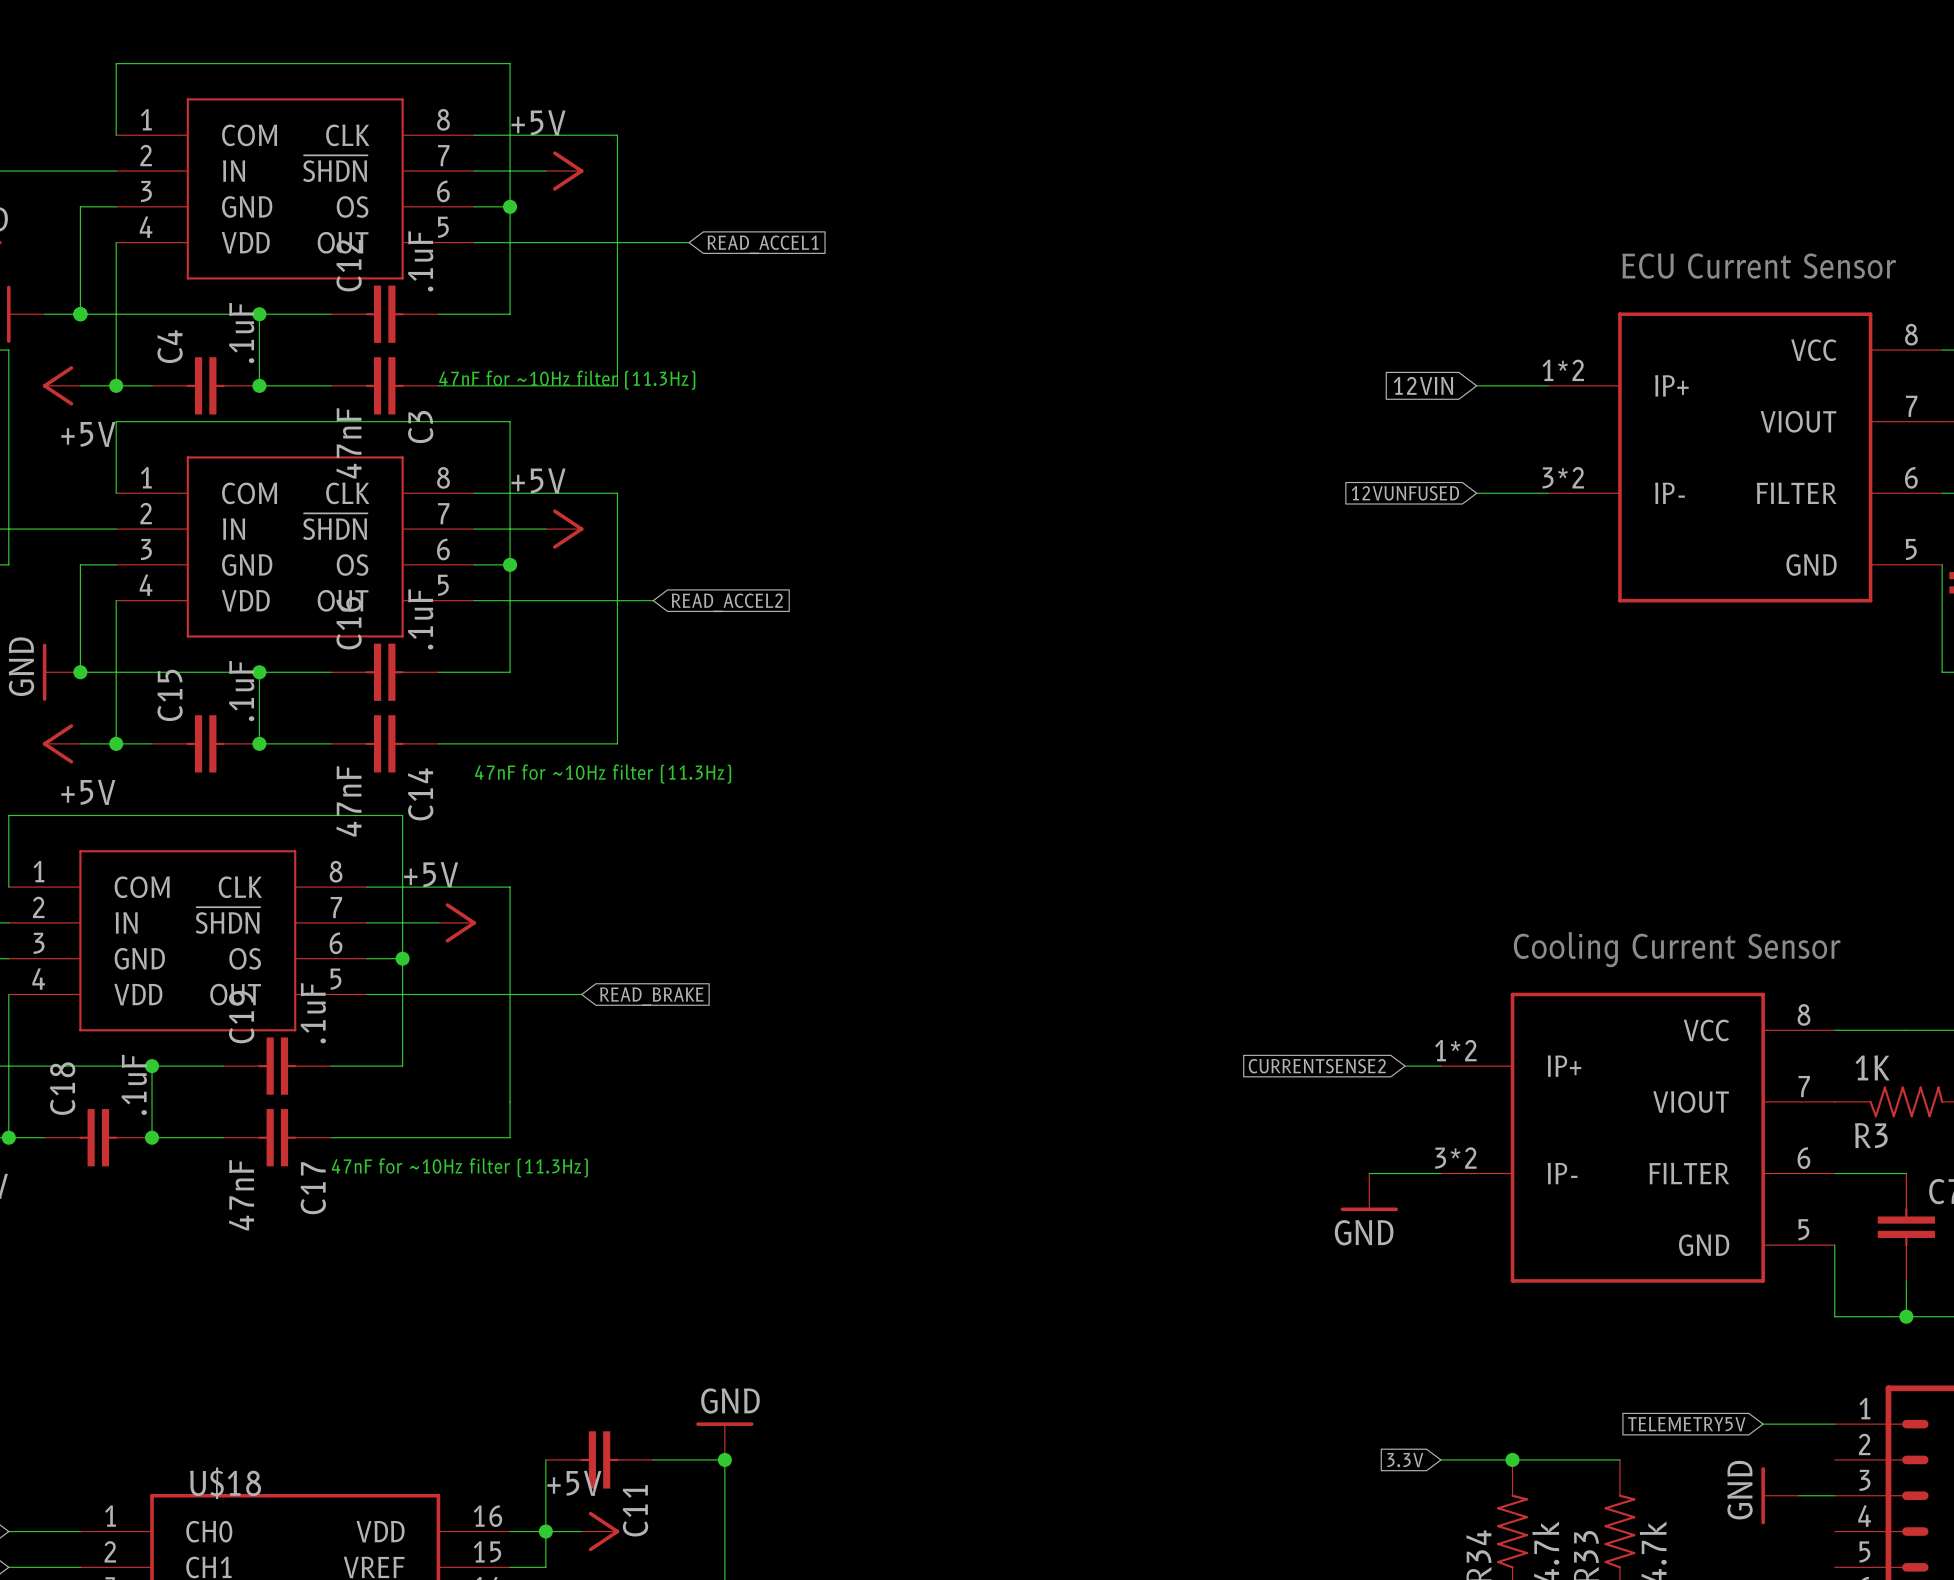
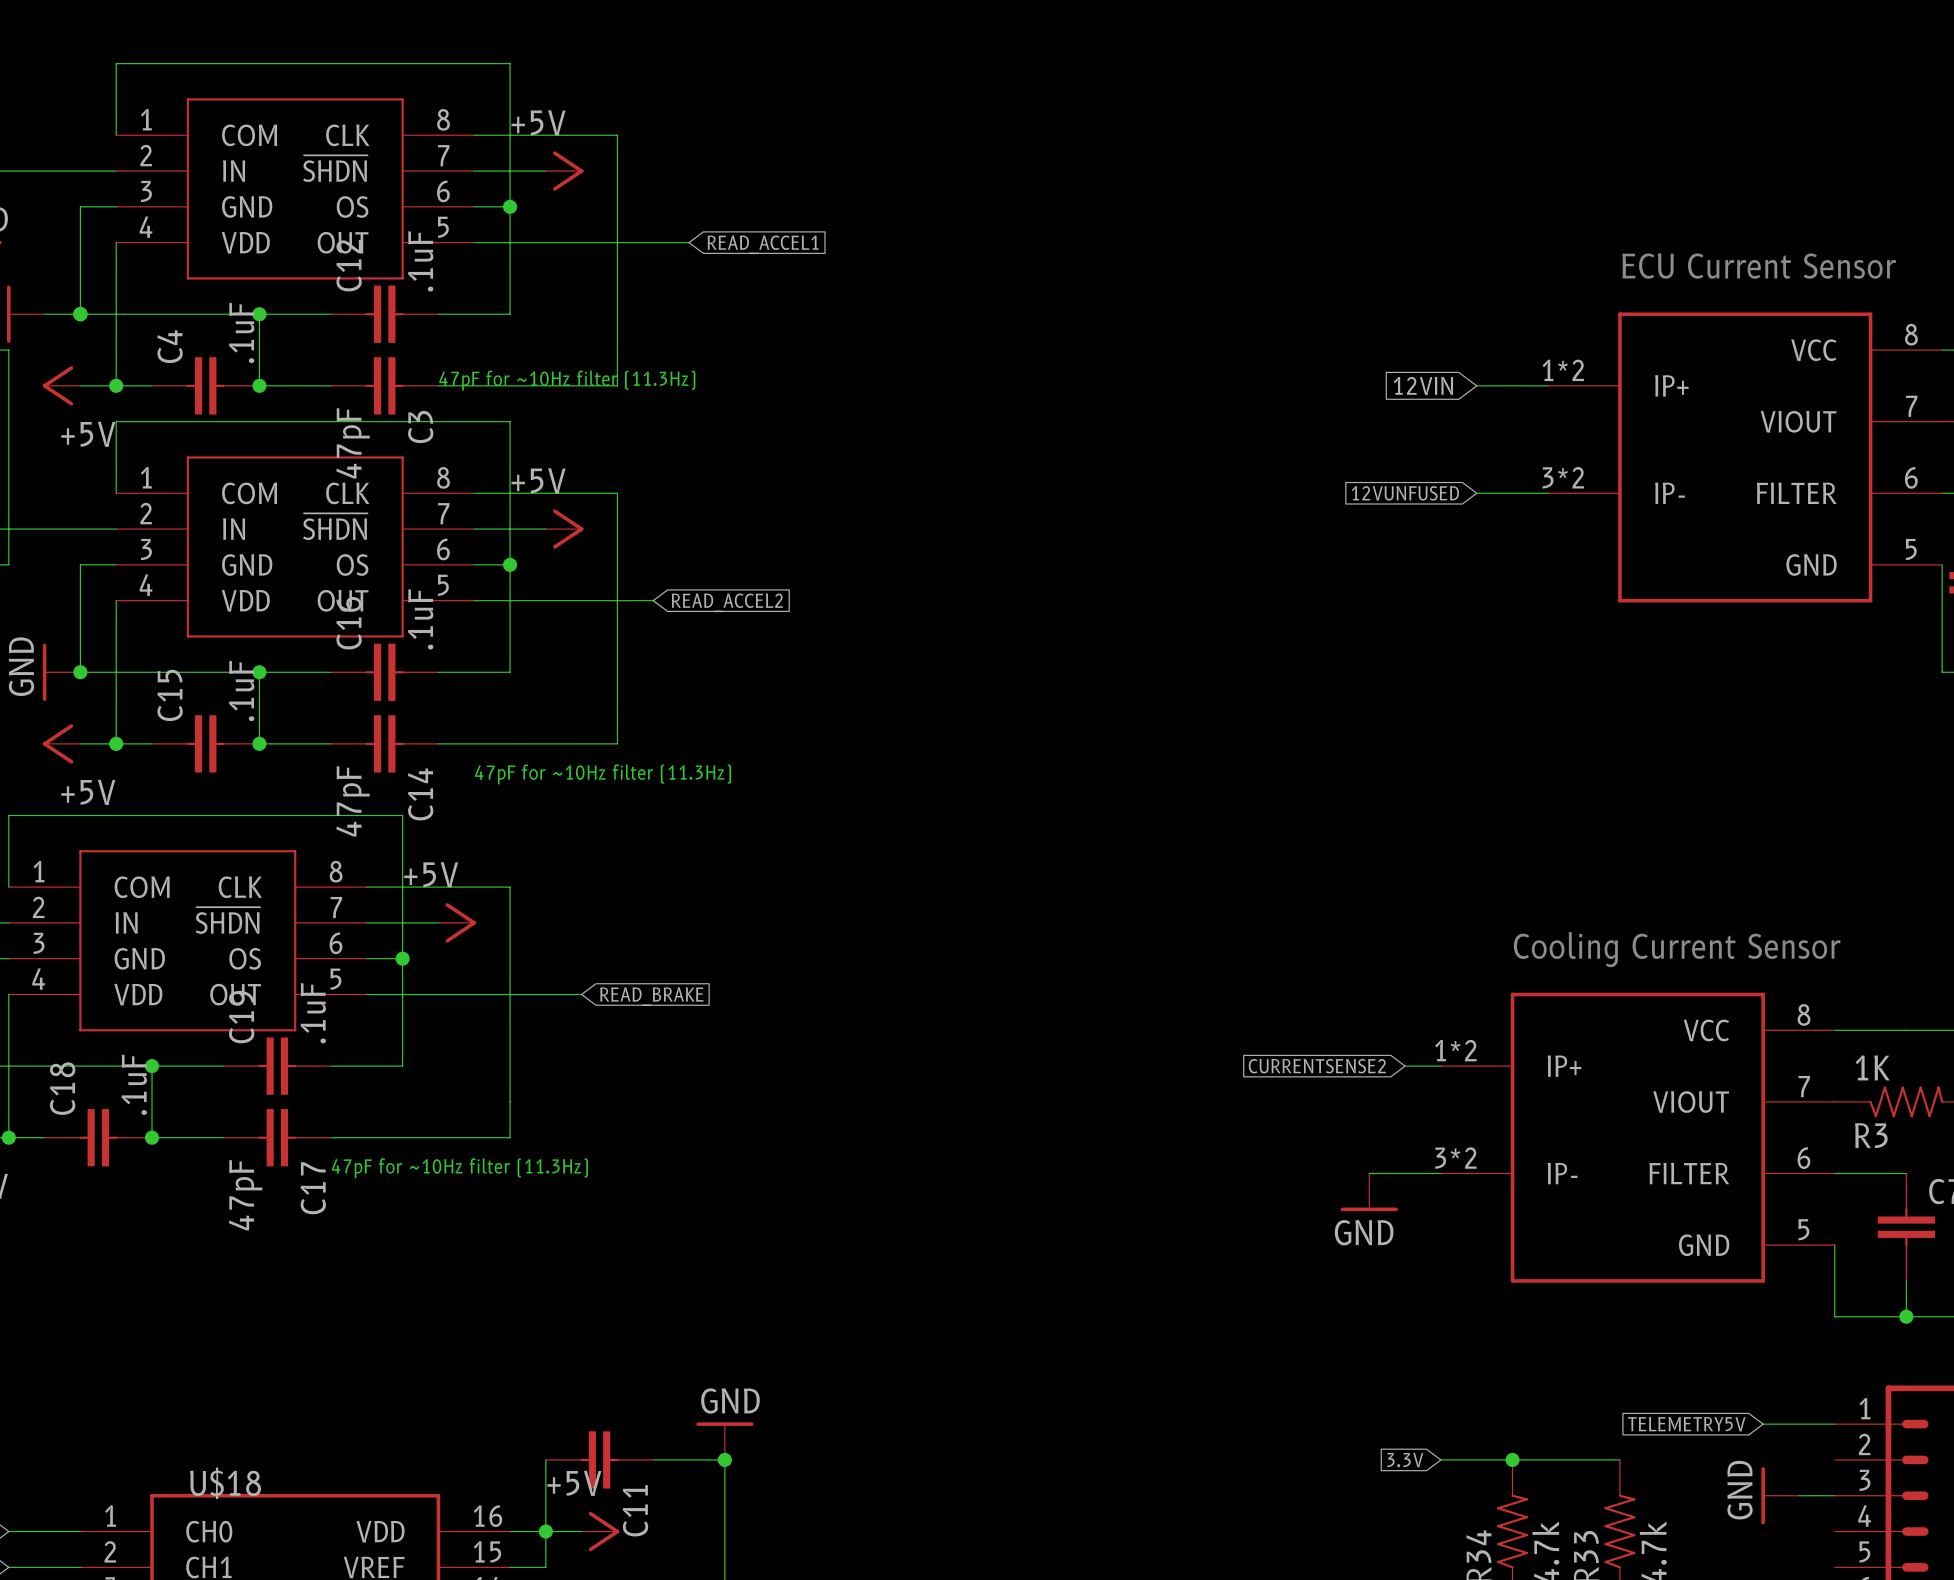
text: 47nF for ~10Hz filter (11.3Hz) (567, 380) -> 47pF for ~10Hz filter (11.3Hz) (567, 380)
C3 value: 47nF (348, 443) -> 47pF (353, 443)
text: 47nF for ~10Hz filter (11.3Hz) (603, 774) -> 47pF for ~10Hz filter (11.3Hz) (603, 774)
C14 value: 47nF (348, 801) -> 47pF (353, 801)
text: 47nF for ~10Hz filter (11.3Hz) (459, 1167) -> 47pF for ~10Hz filter (11.3Hz) (459, 1168)
C17 value: 47nF (241, 1195) -> 47pF (245, 1195)

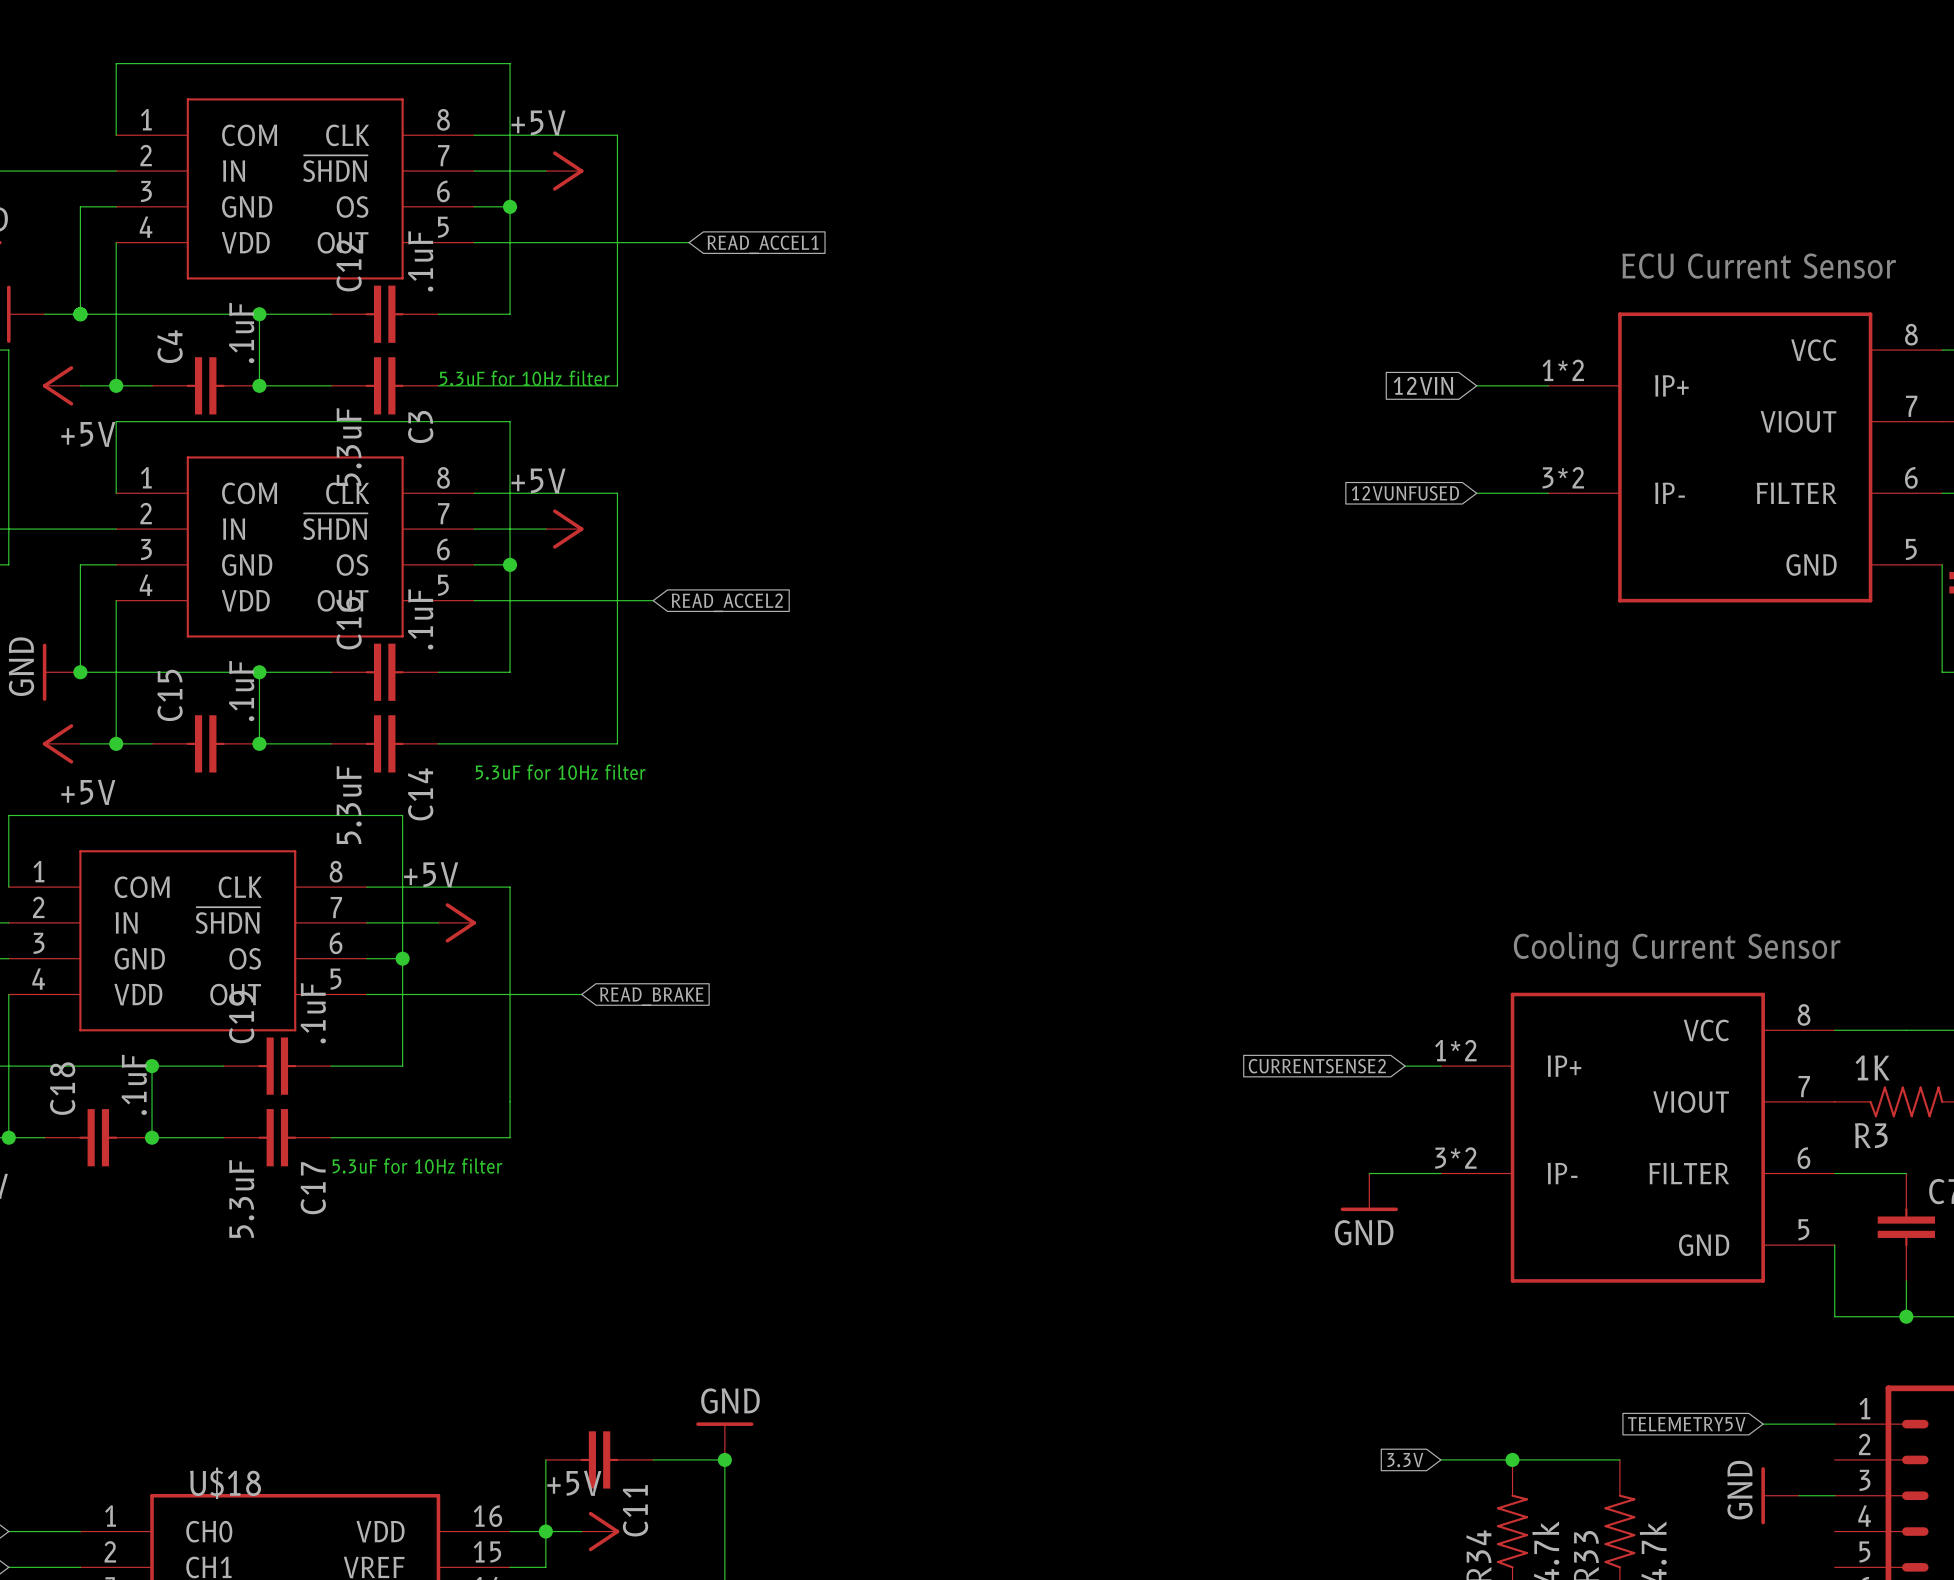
text: 47pF for ~10Hz filter (11.3Hz) (567, 380) -> 5.3uF for 10Hz filter (524, 378)
C3 value: 47pF (353, 443) -> 5.3uF (349, 447)
text: 47pF for ~10Hz filter (11.3Hz) (603, 774) -> 5.3uF for 10Hz filter (560, 772)
C14 value: 47pF (353, 801) -> 5.3uF (349, 805)
text: 47pF for ~10Hz filter (11.3Hz) (459, 1168) -> 5.3uF for 10Hz filter (417, 1165)
C17 value: 47pF (245, 1195) -> 5.3uF (241, 1198)

